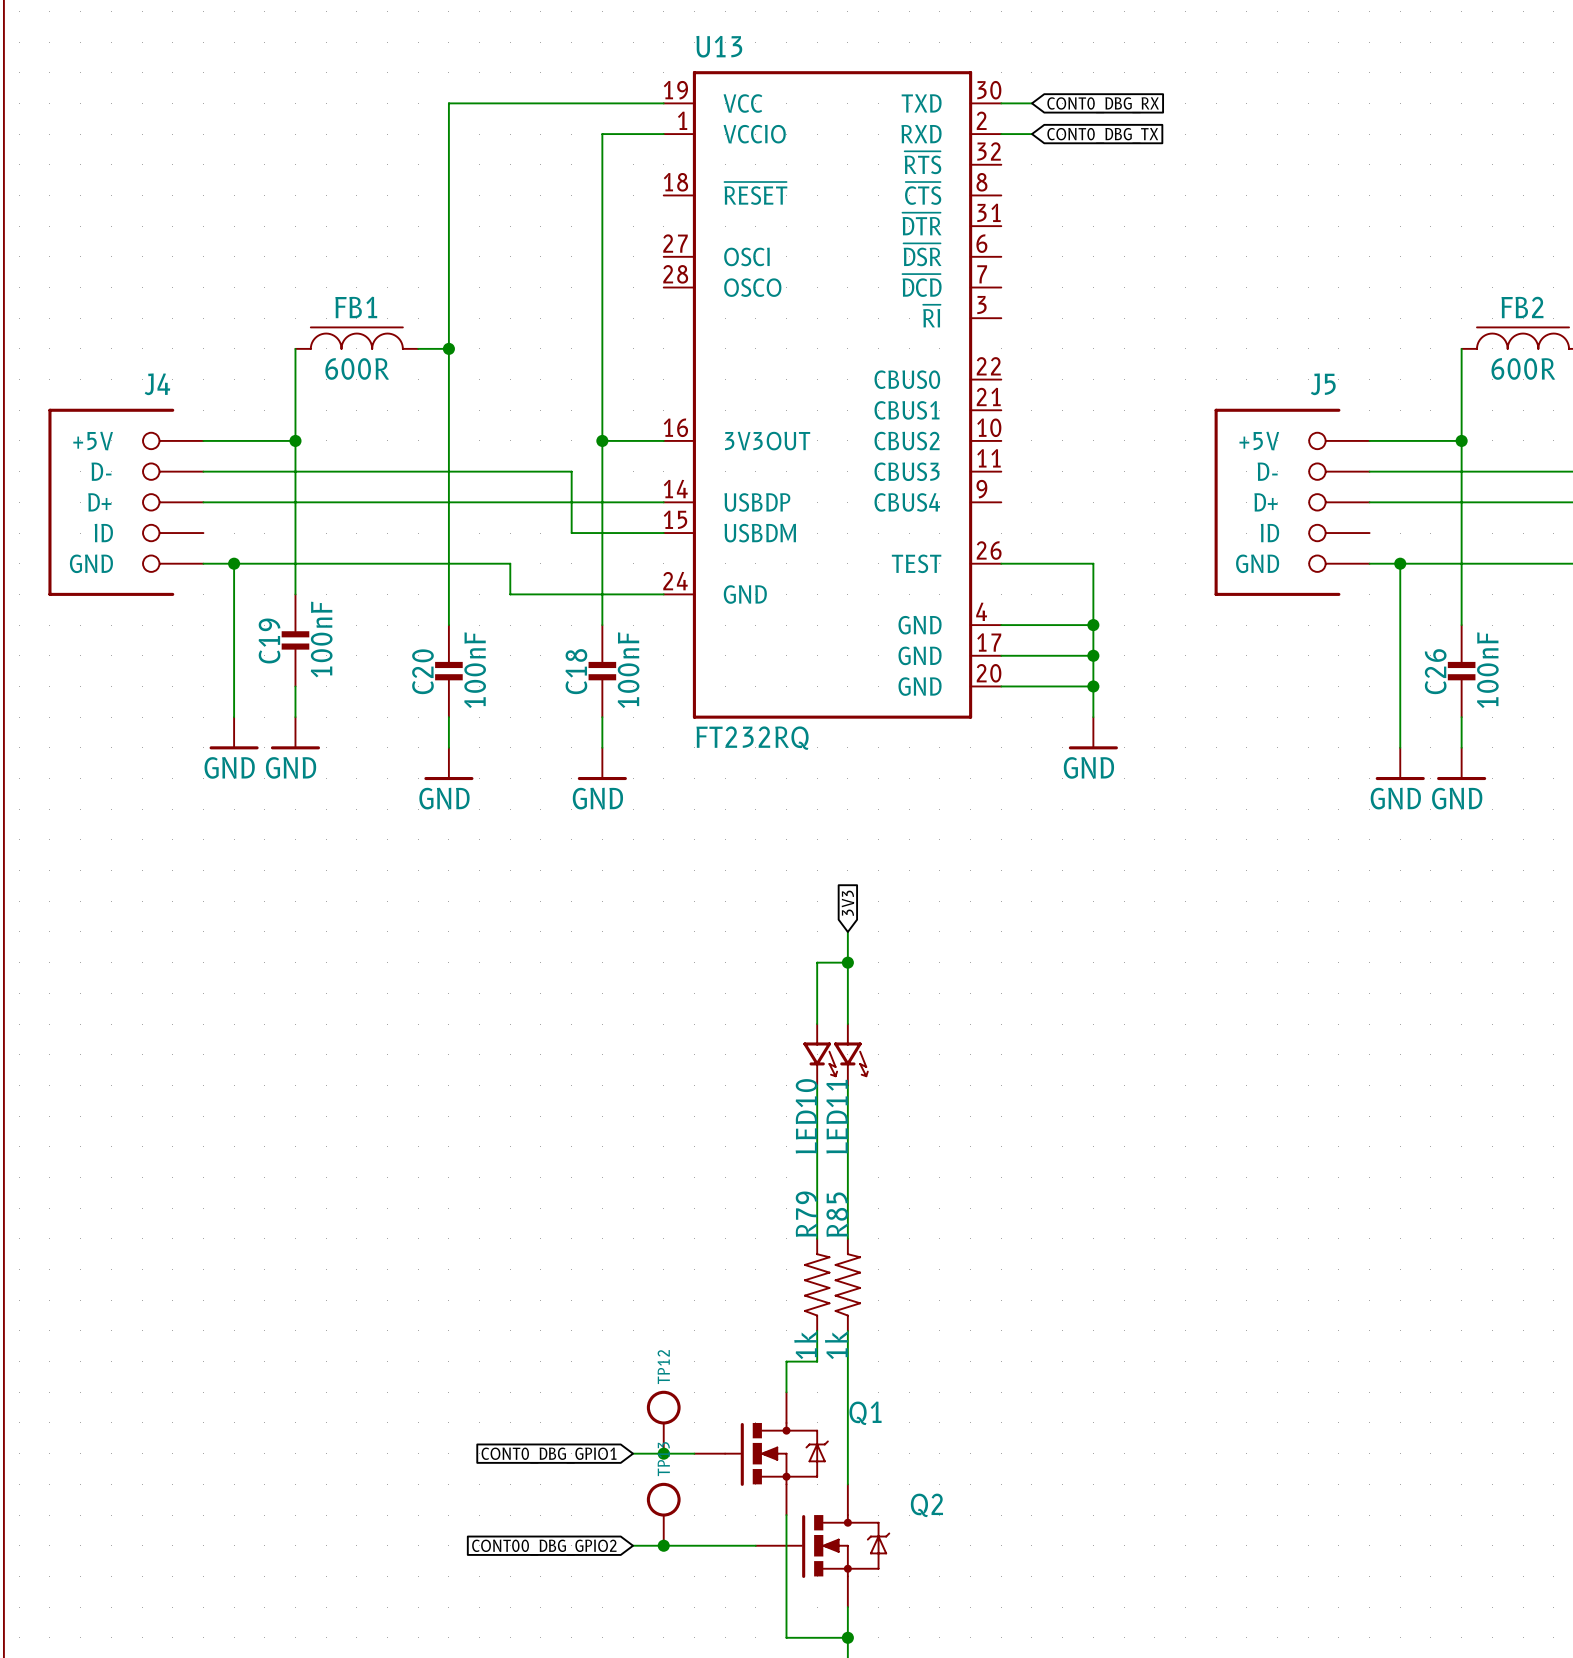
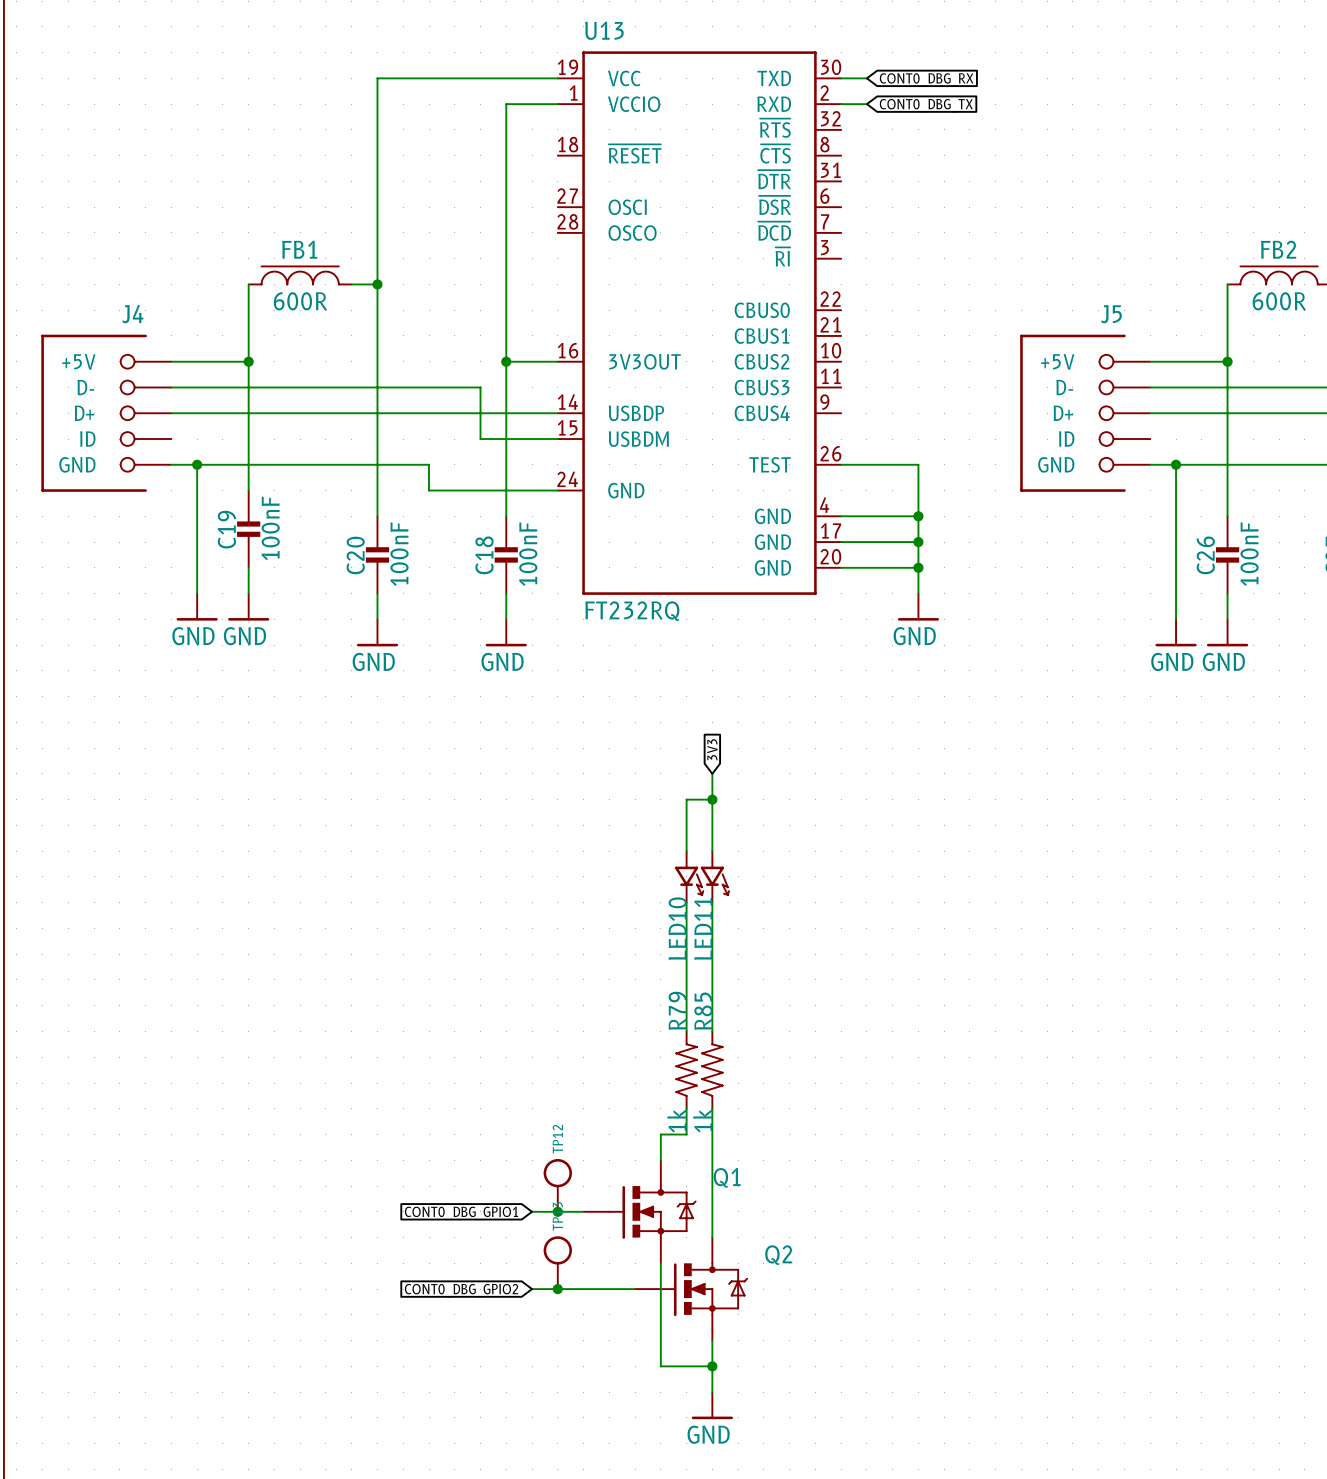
global label: CONT00_DBG_GPIO2 (544, 1547) -> CONT0_DBG_GPIO2 (461, 1290)

